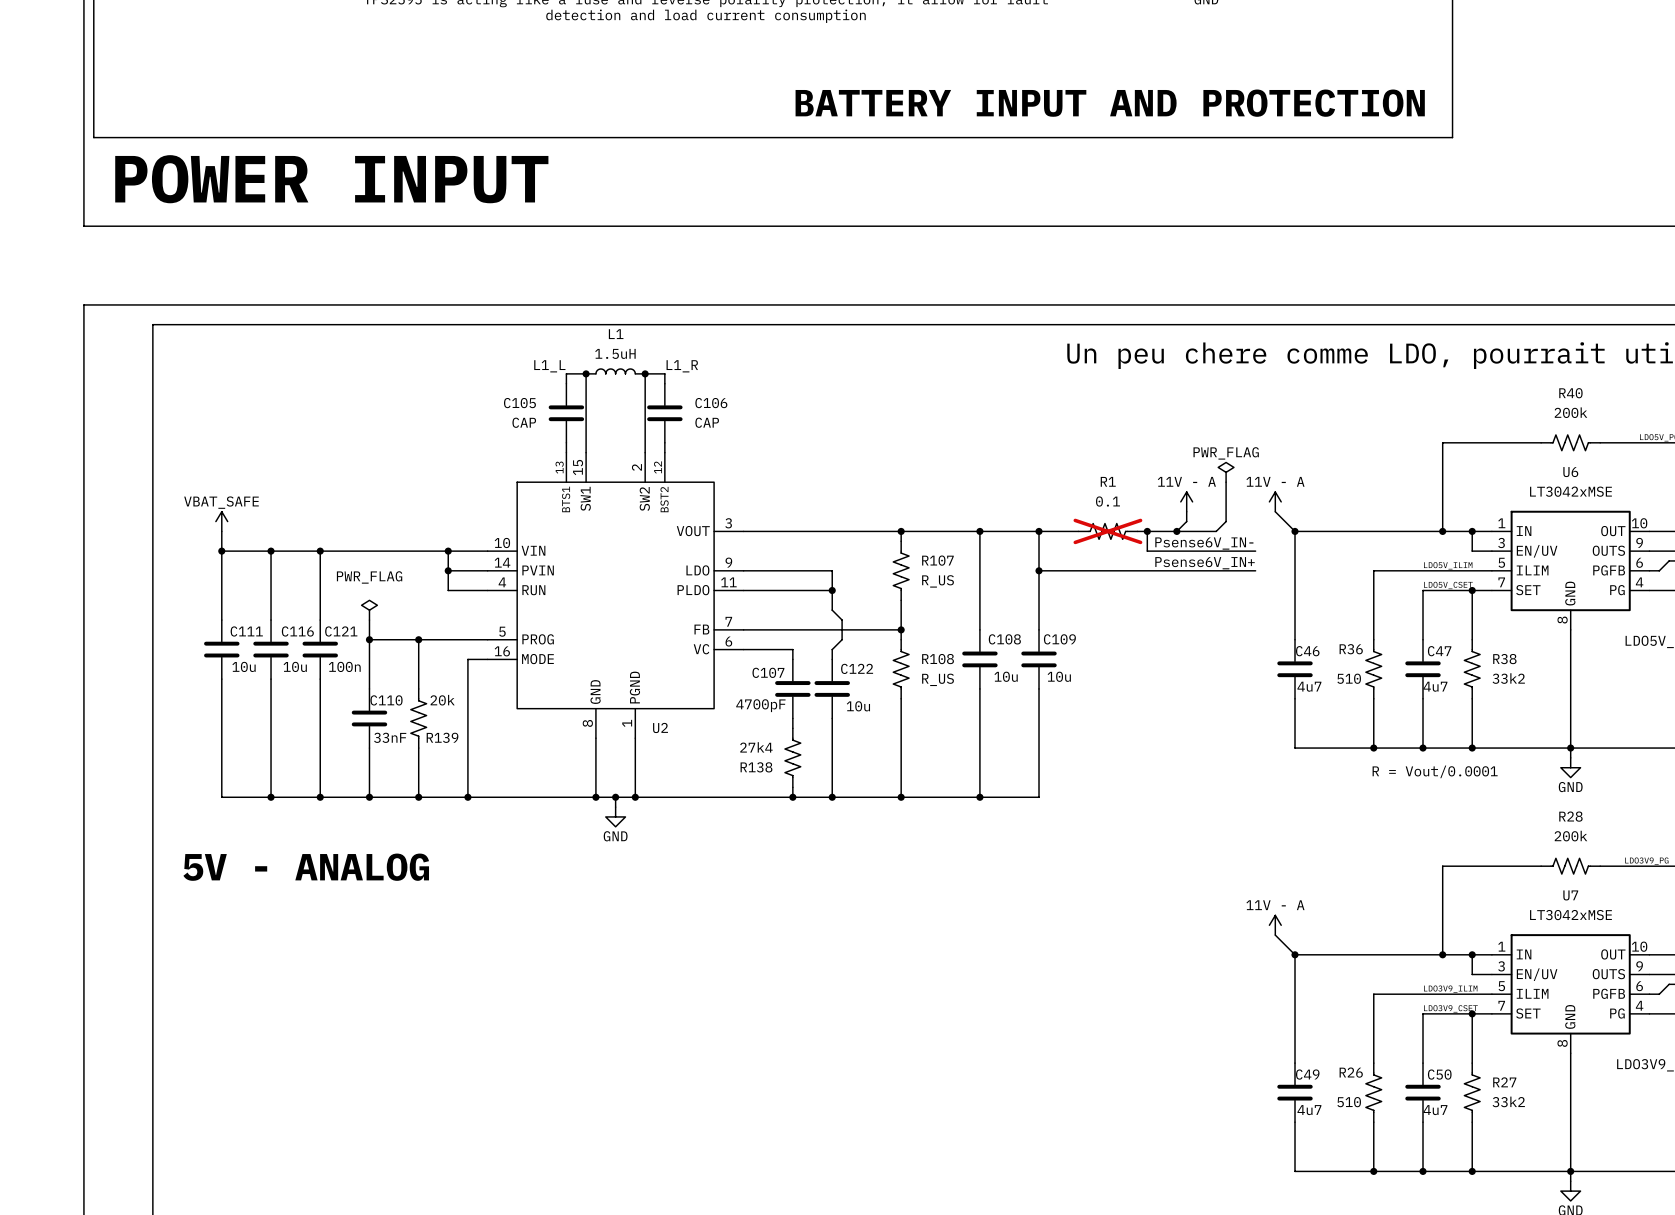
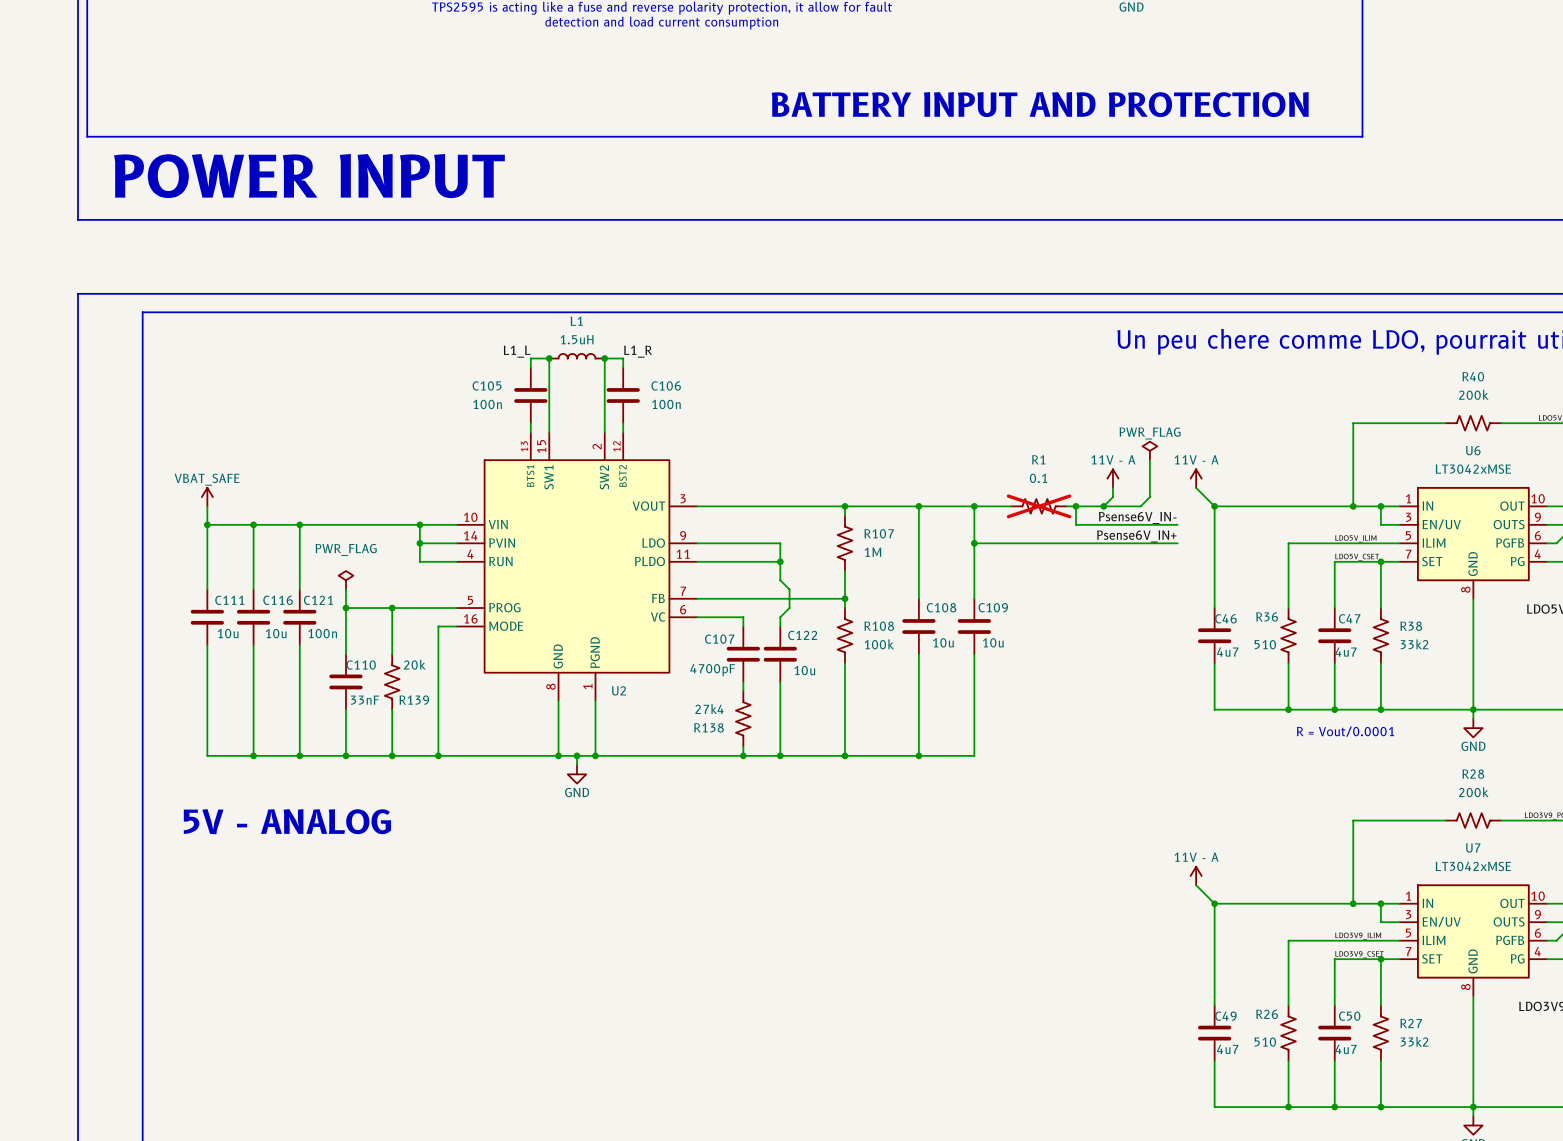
C105 value: CAP (524, 422) -> 100n (487, 404)
C106 value: CAP (707, 422) -> 100n (666, 404)
R107 value: R_US (938, 581) -> 1M (872, 552)
R108 value: R_US (938, 679) -> 100k (879, 644)

